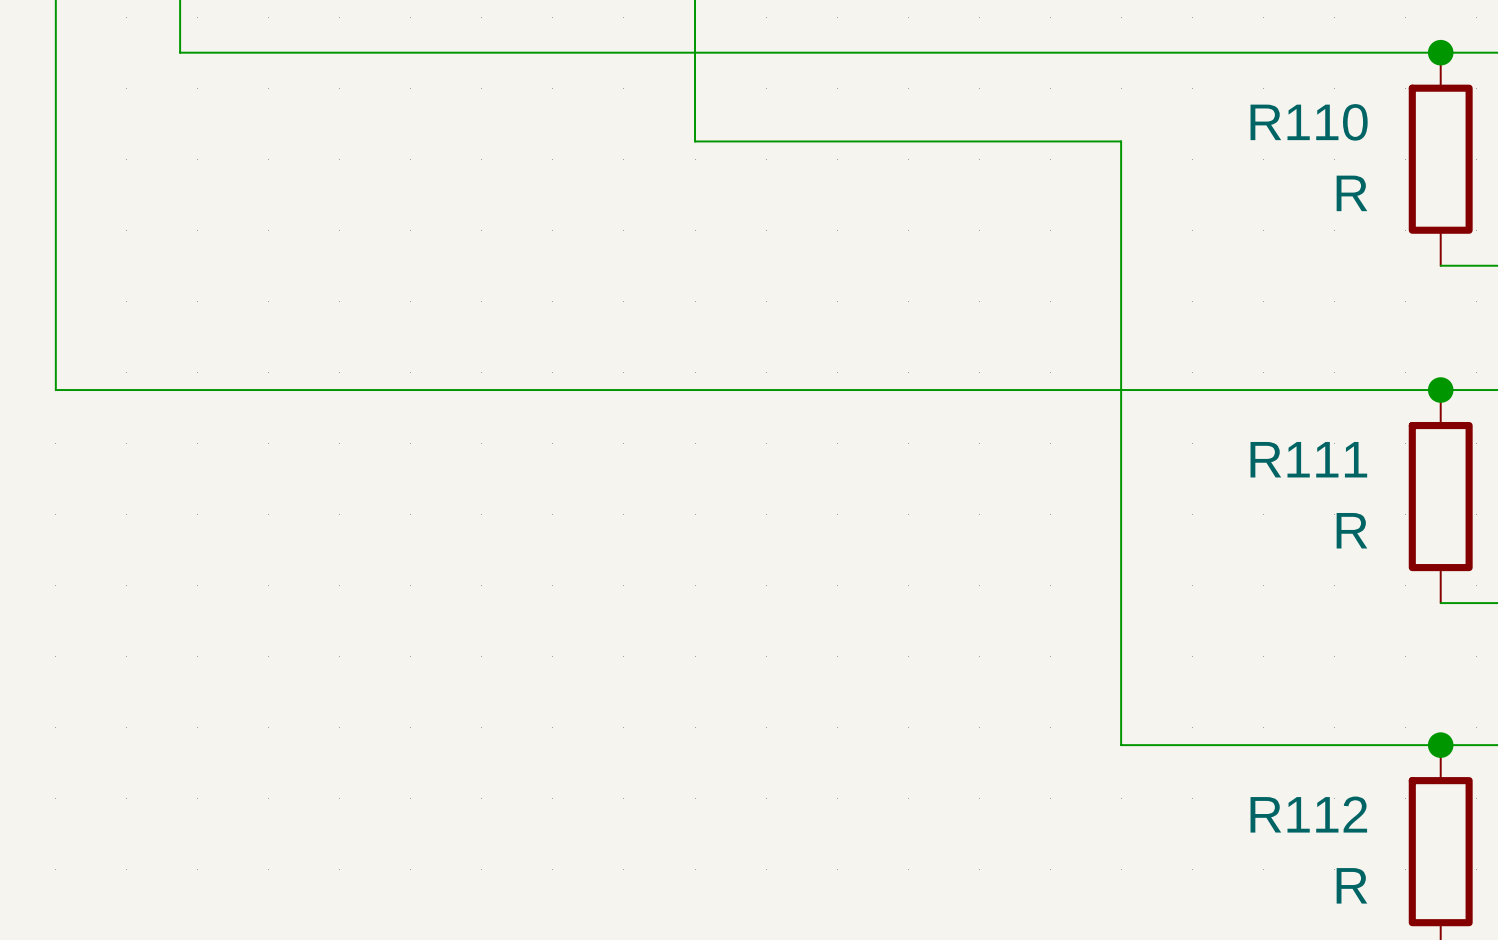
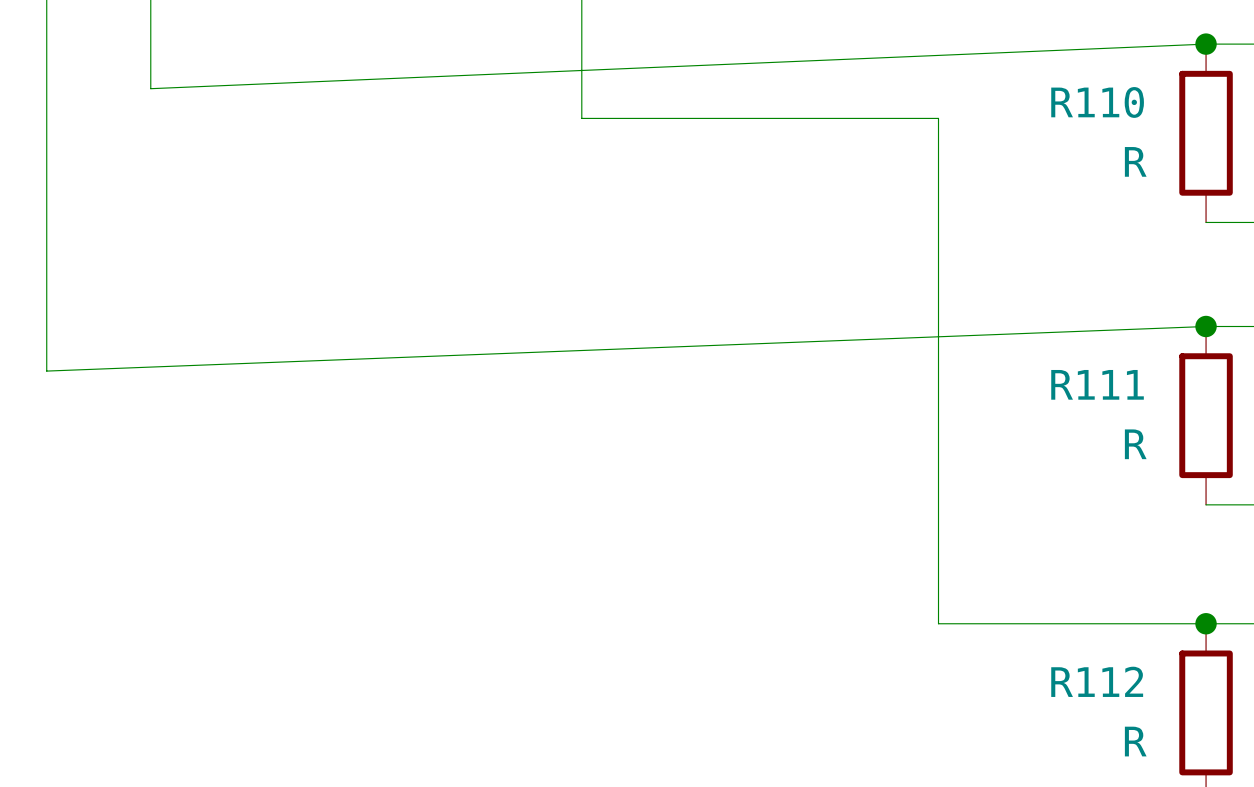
wire: (180, 52) (1440, 52) -> (150, 44) (150, 88) (1206, 44)
wire: (55, 390) (1440, 390) -> (46, 326) (46, 371) (1206, 326)

